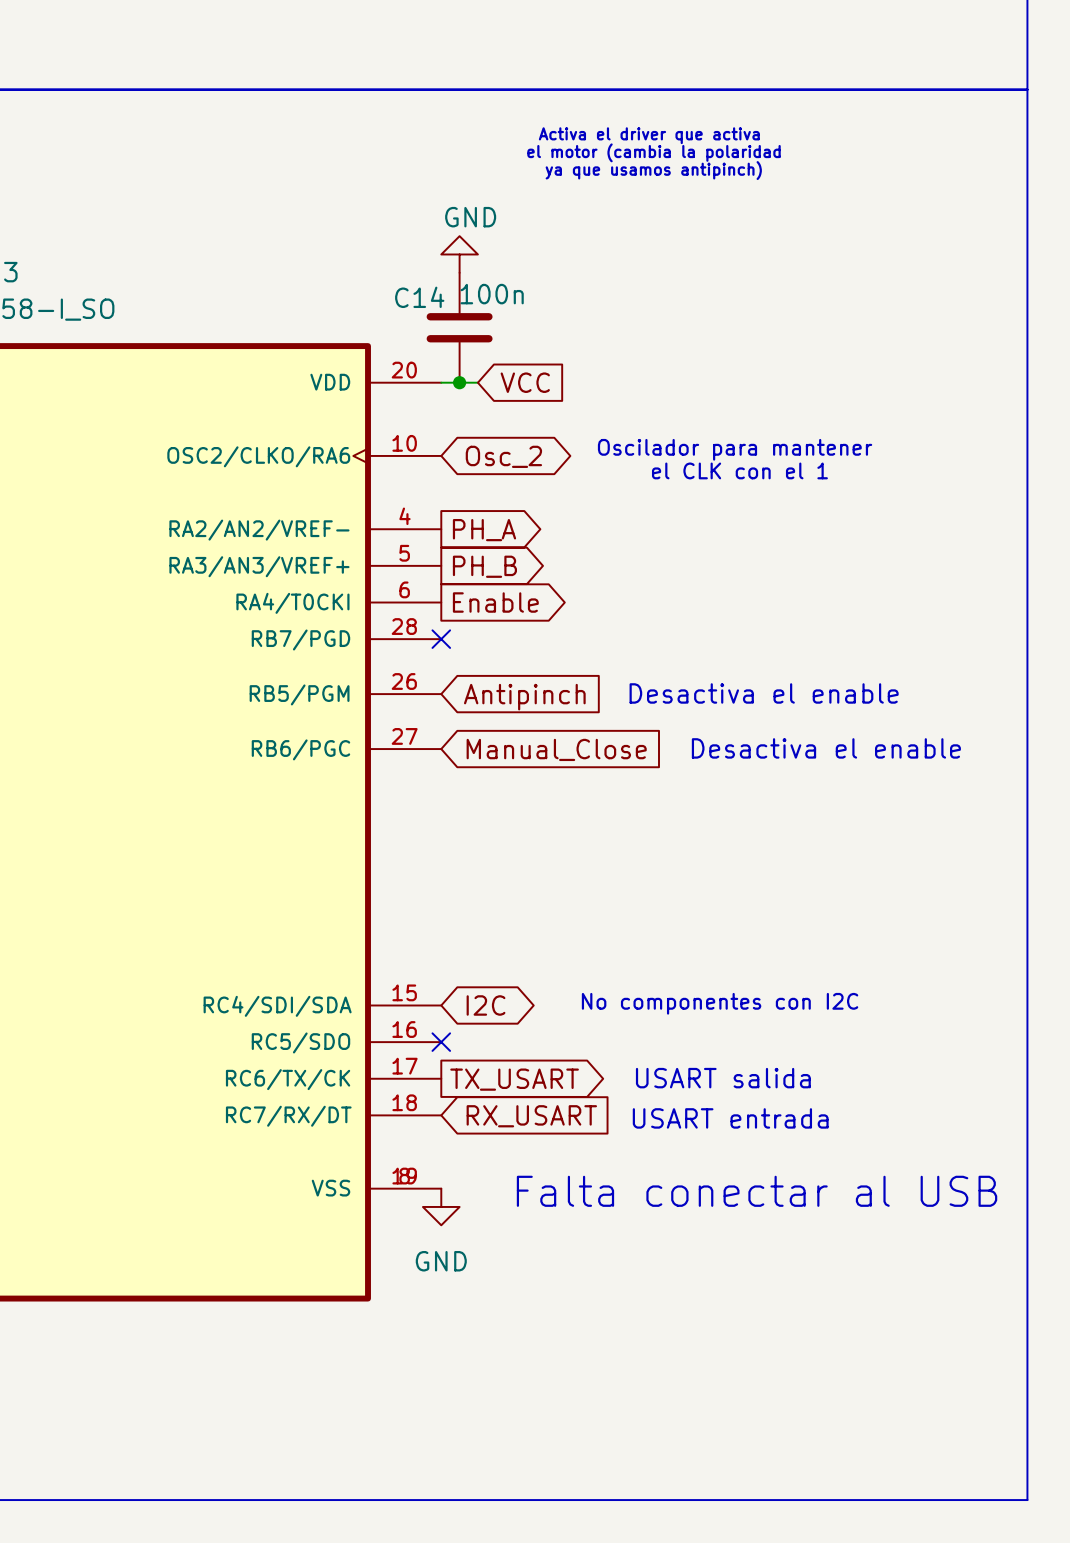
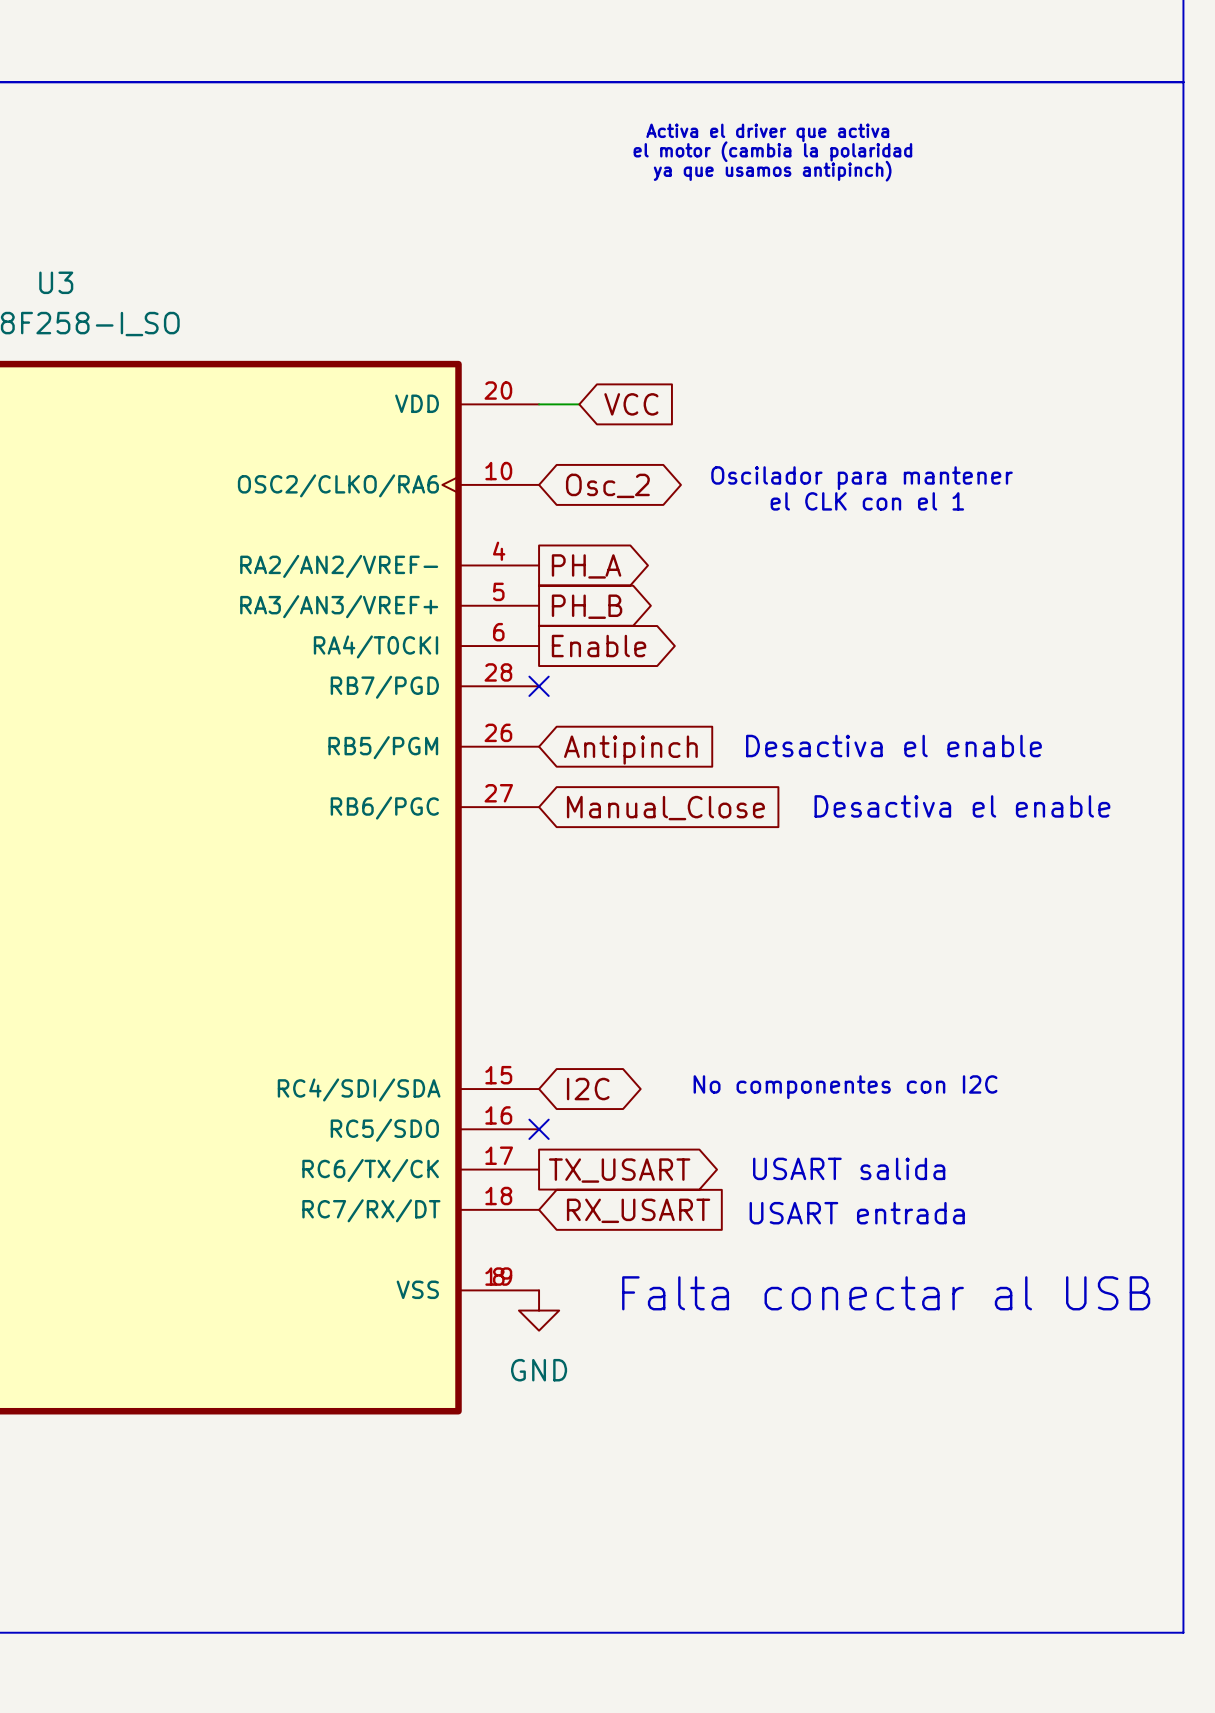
power symbol: GND (459, 254) -> none
C14: 100n (459, 327) -> none
junction: (459, 382) -> none

